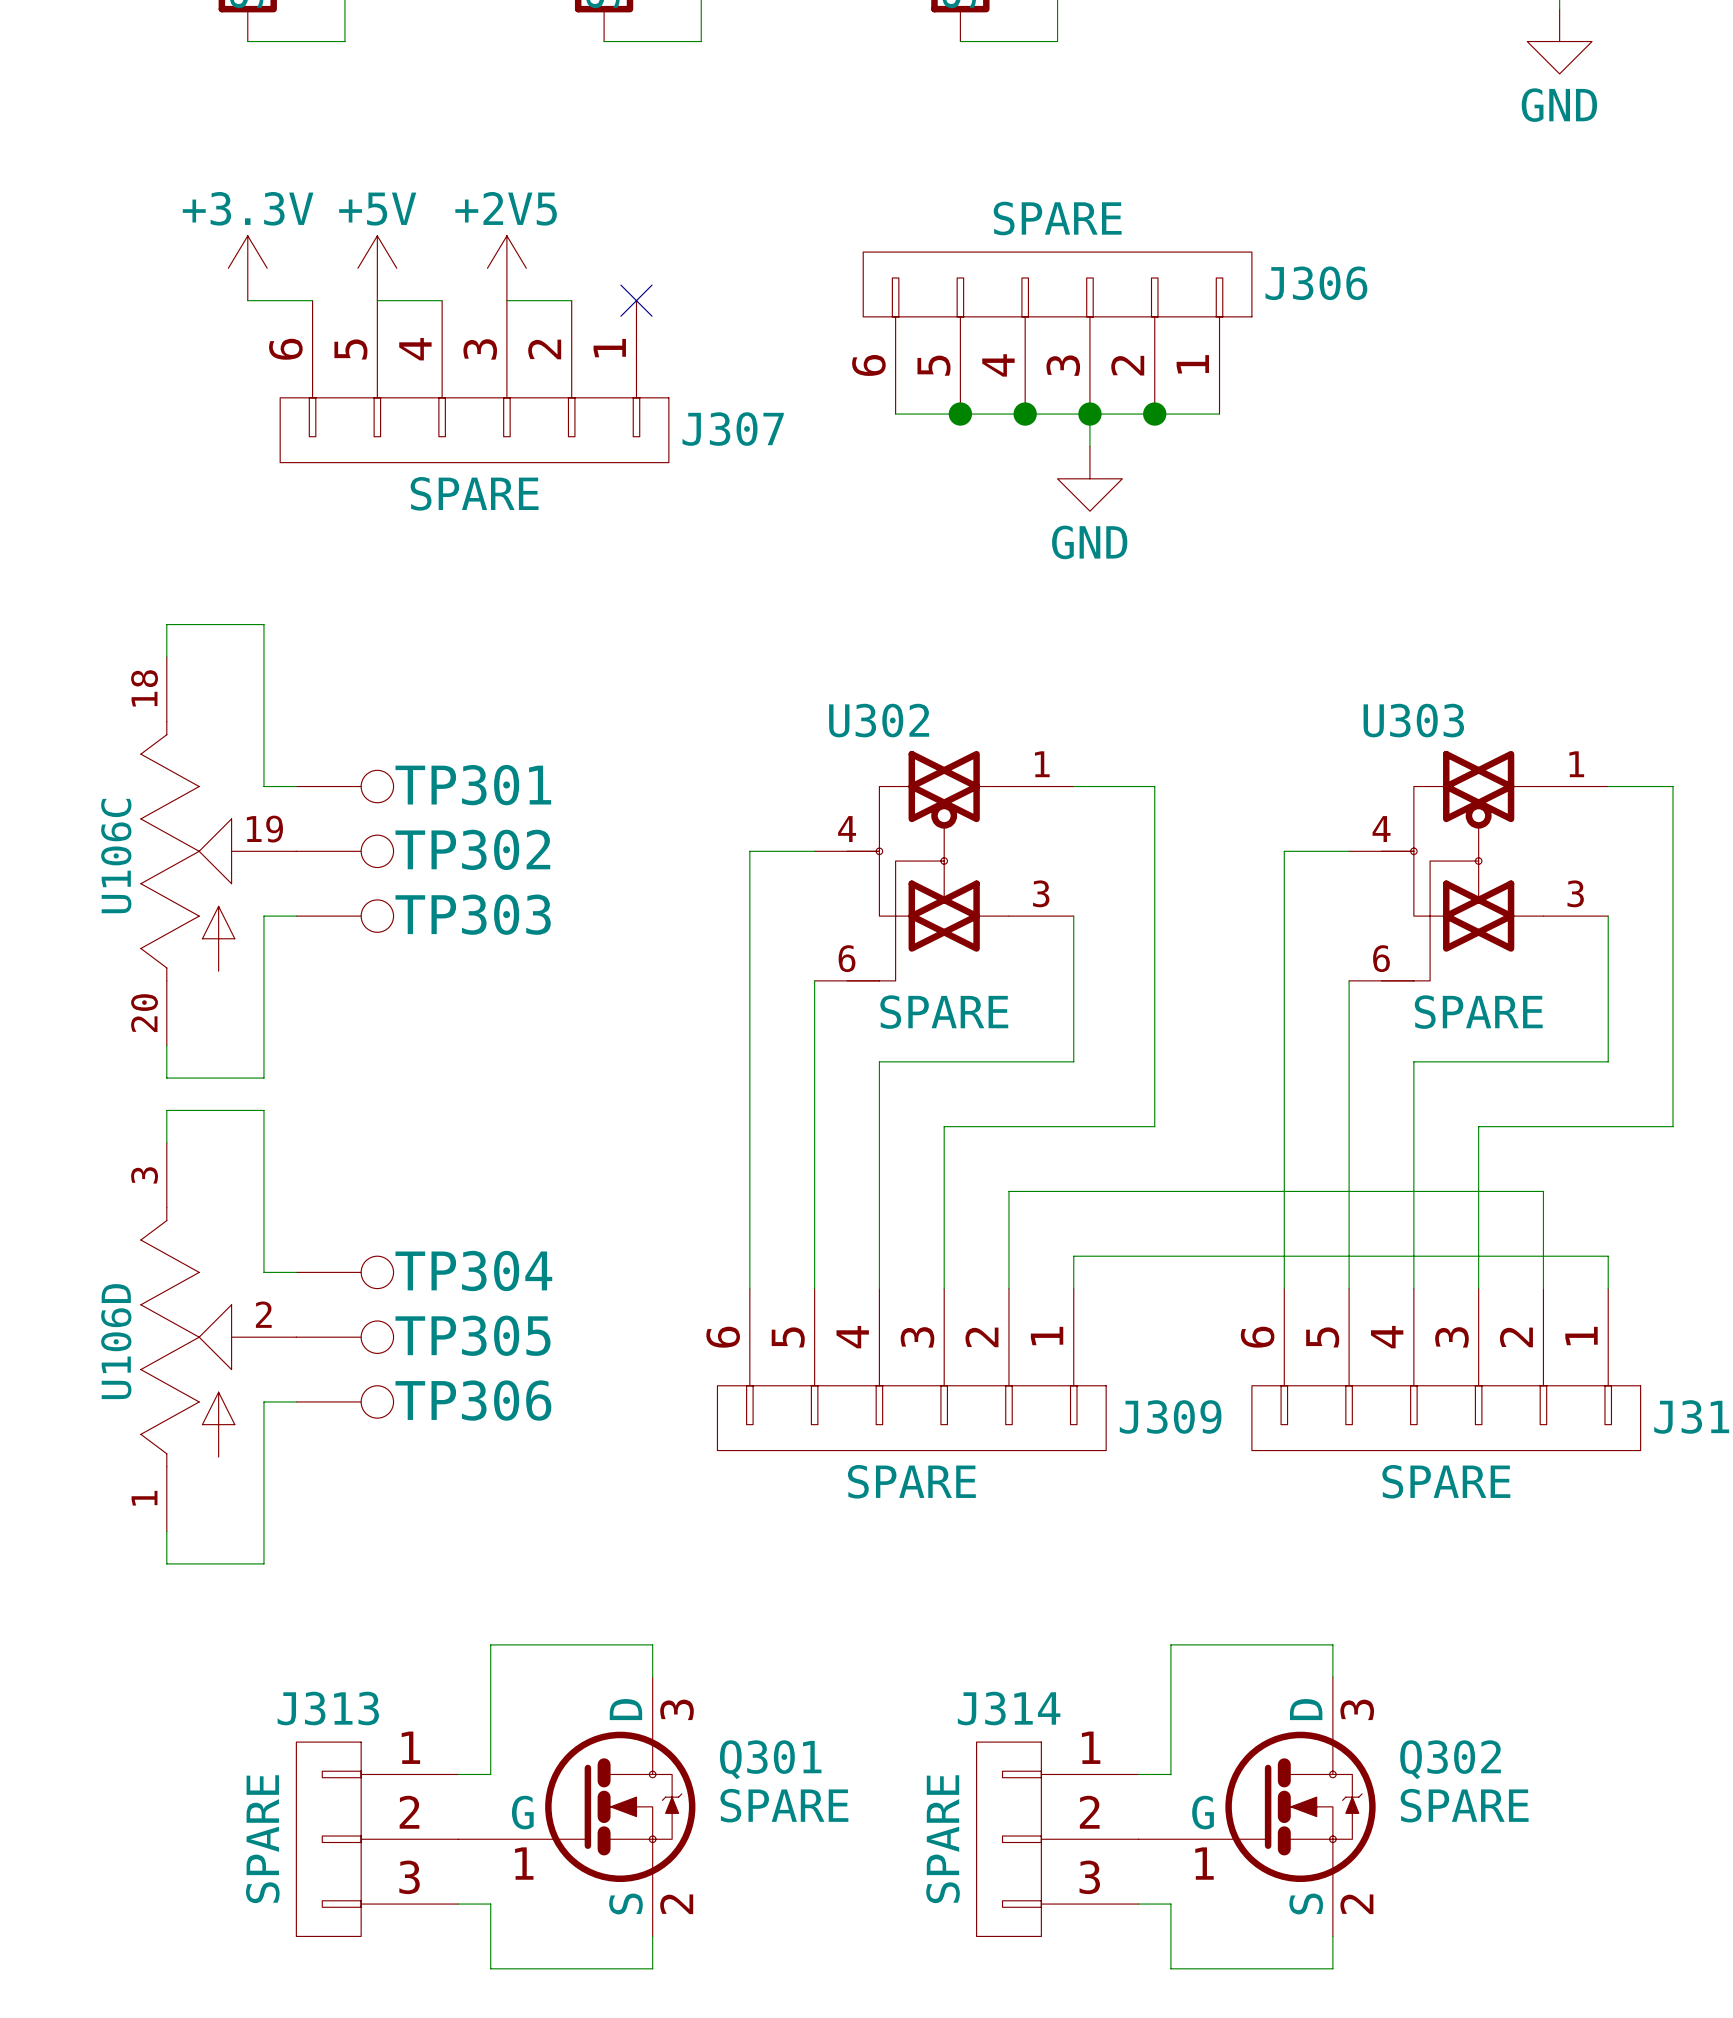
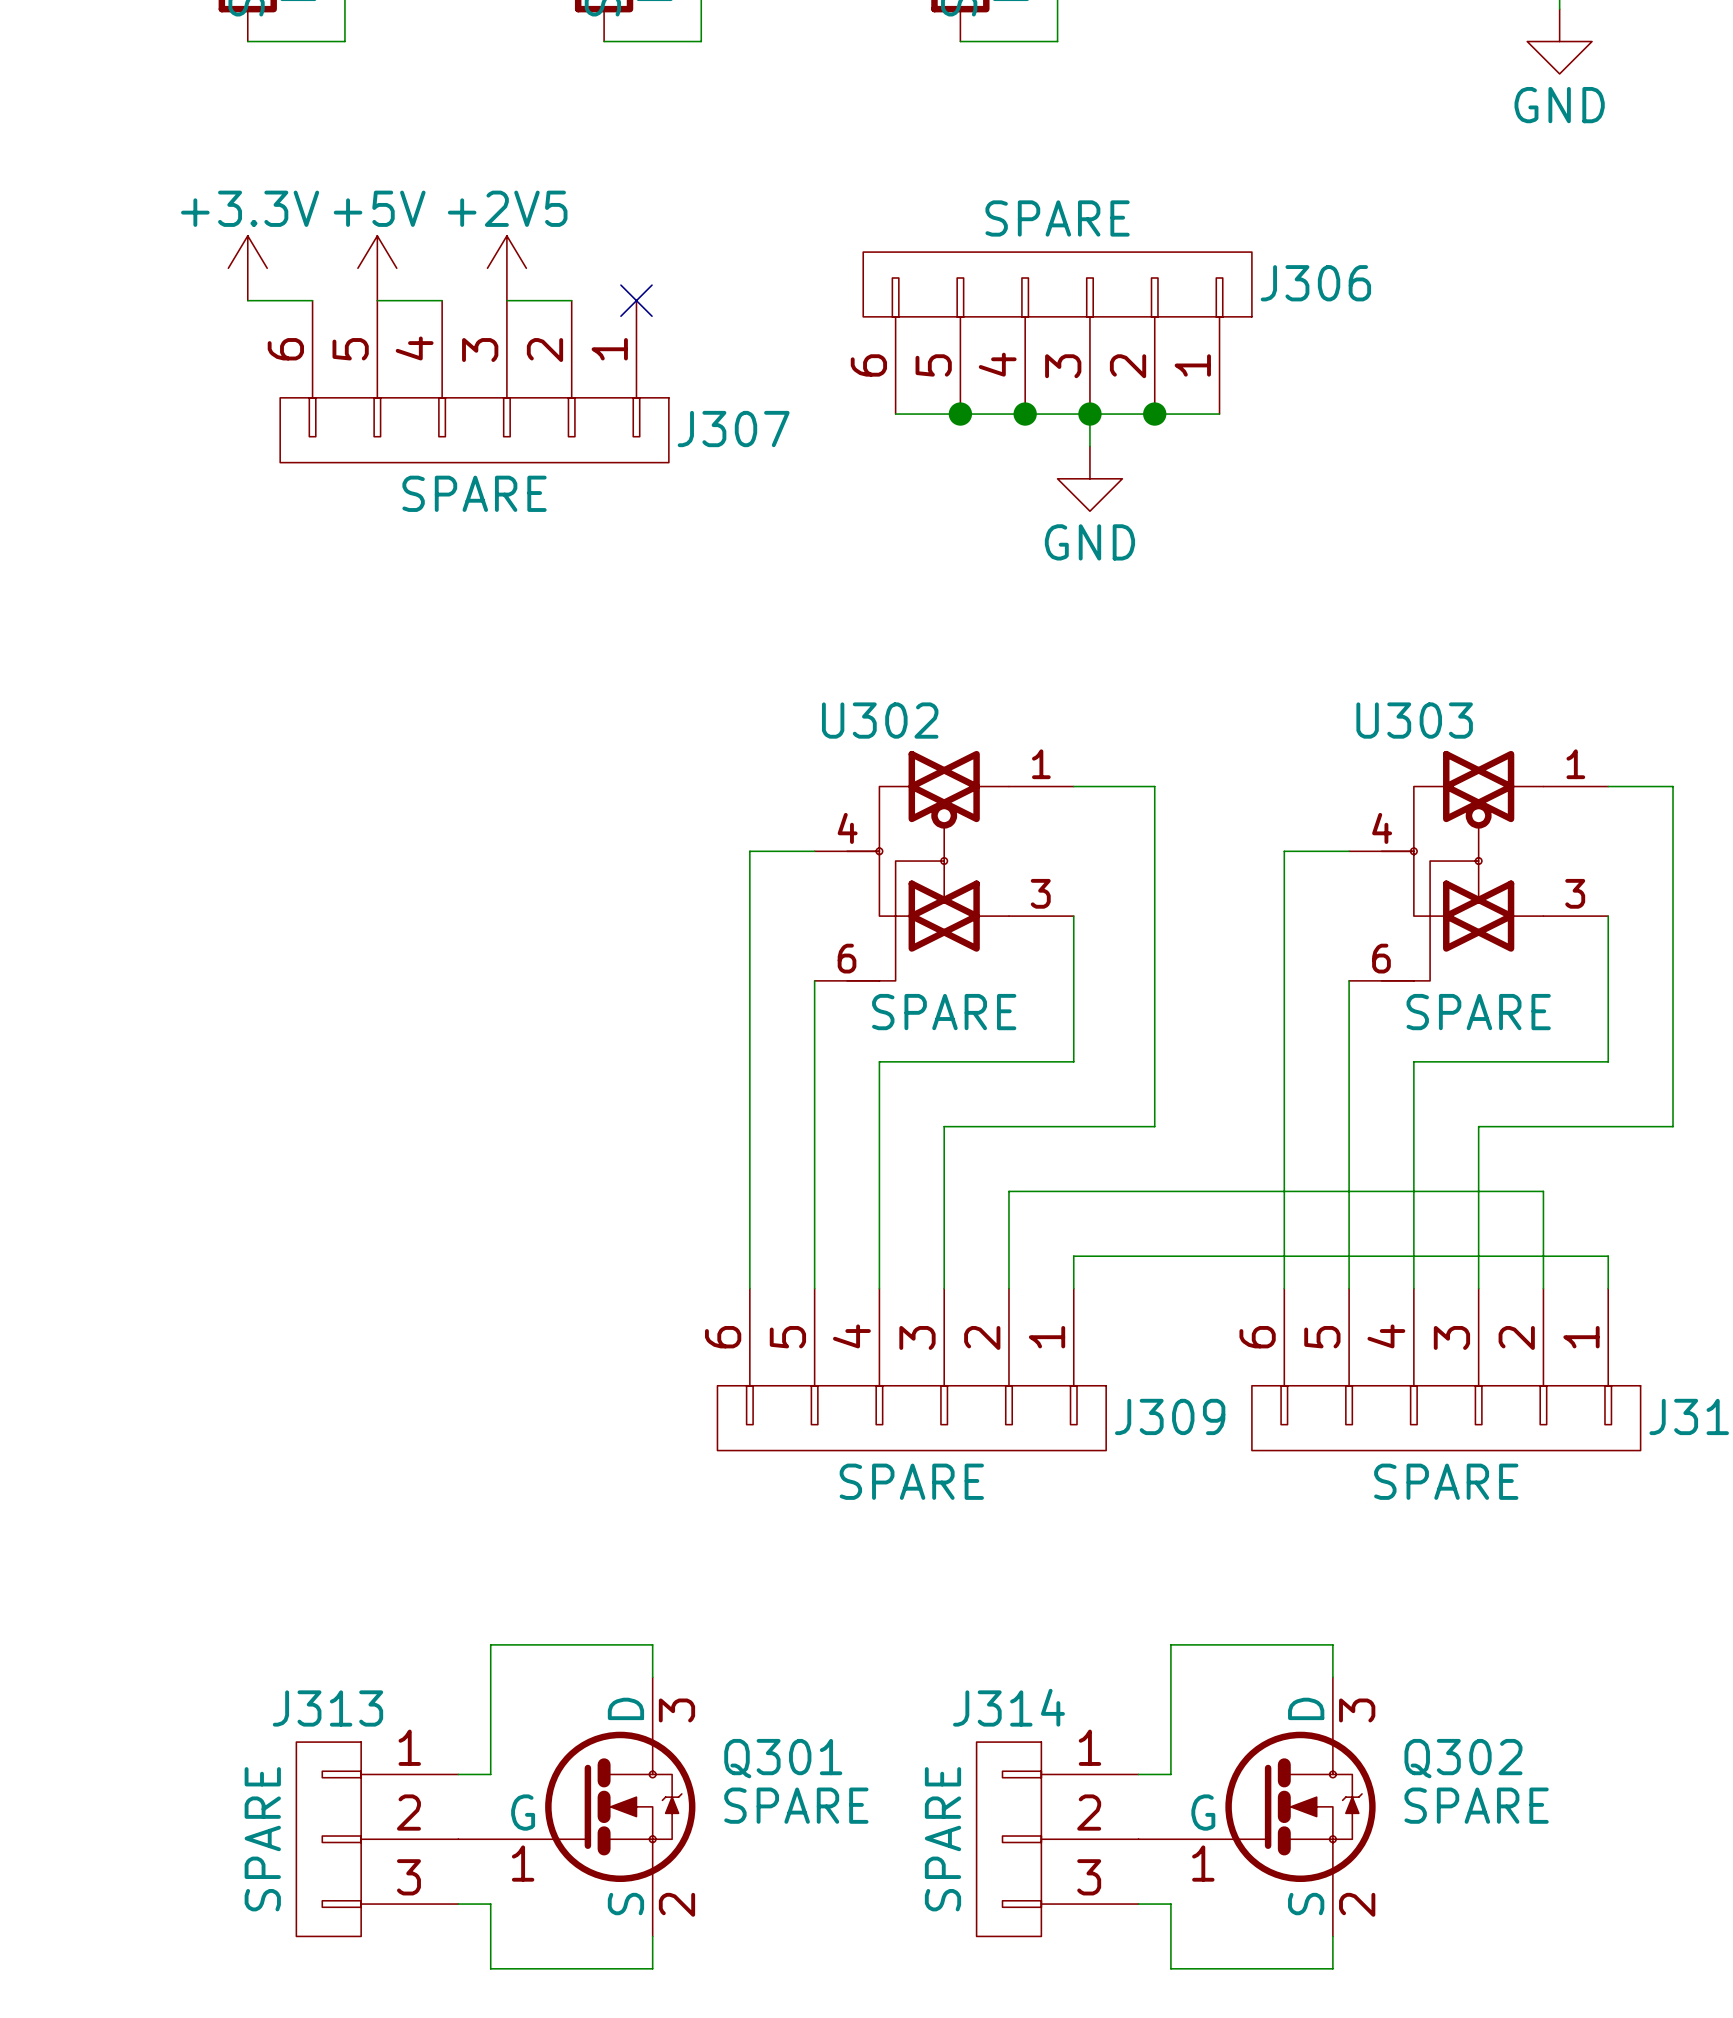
wire: (166, 656) (166, 624) (263, 624) (263, 786) (296, 786) -> none
TP301: (344, 786) -> none
U106C: (218, 851) -> none
TP302: (344, 851) -> none
wire: (296, 916) (263, 916) (263, 1078) (166, 1078) (166, 1045) -> none
TP303: (344, 916) -> none
wire: (166, 1142) (166, 1110) (263, 1110) (263, 1272) (296, 1272) -> none
TP304: (344, 1272) -> none
U106D: (218, 1337) -> none
TP305: (344, 1337) -> none
wire: (296, 1401) (263, 1401) (263, 1563) (166, 1563) (166, 1531) -> none
TP306: (344, 1401) -> none

